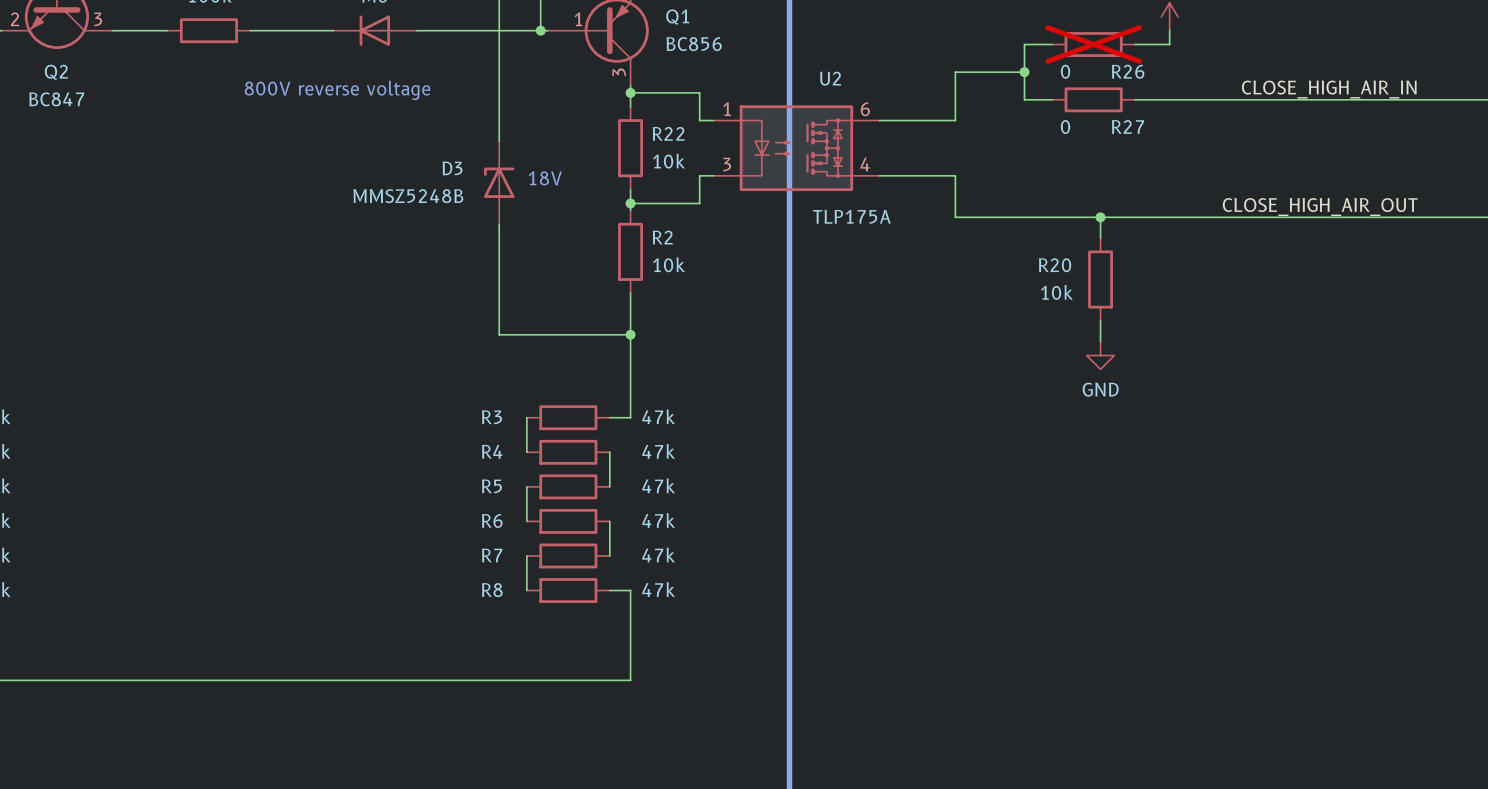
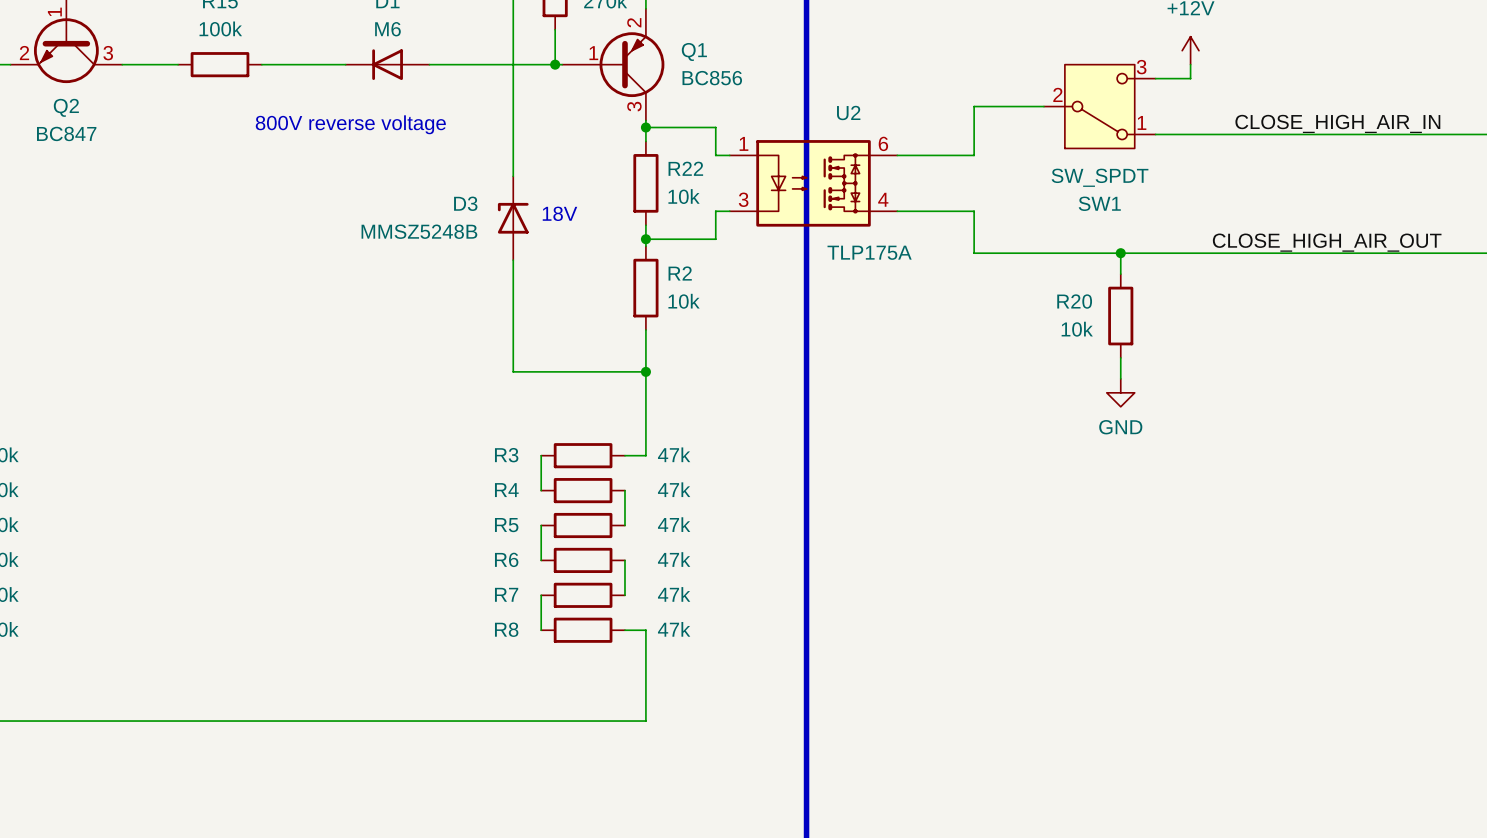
wire: (1052, 44) (1024, 44) (1024, 99) (1052, 99) -> none
R26: 0 (1093, 44) -> none
junction: (1024, 72) -> none
SW1: none -> SW_SPDT (1099, 106)
R27: 0 (1093, 99) -> none

